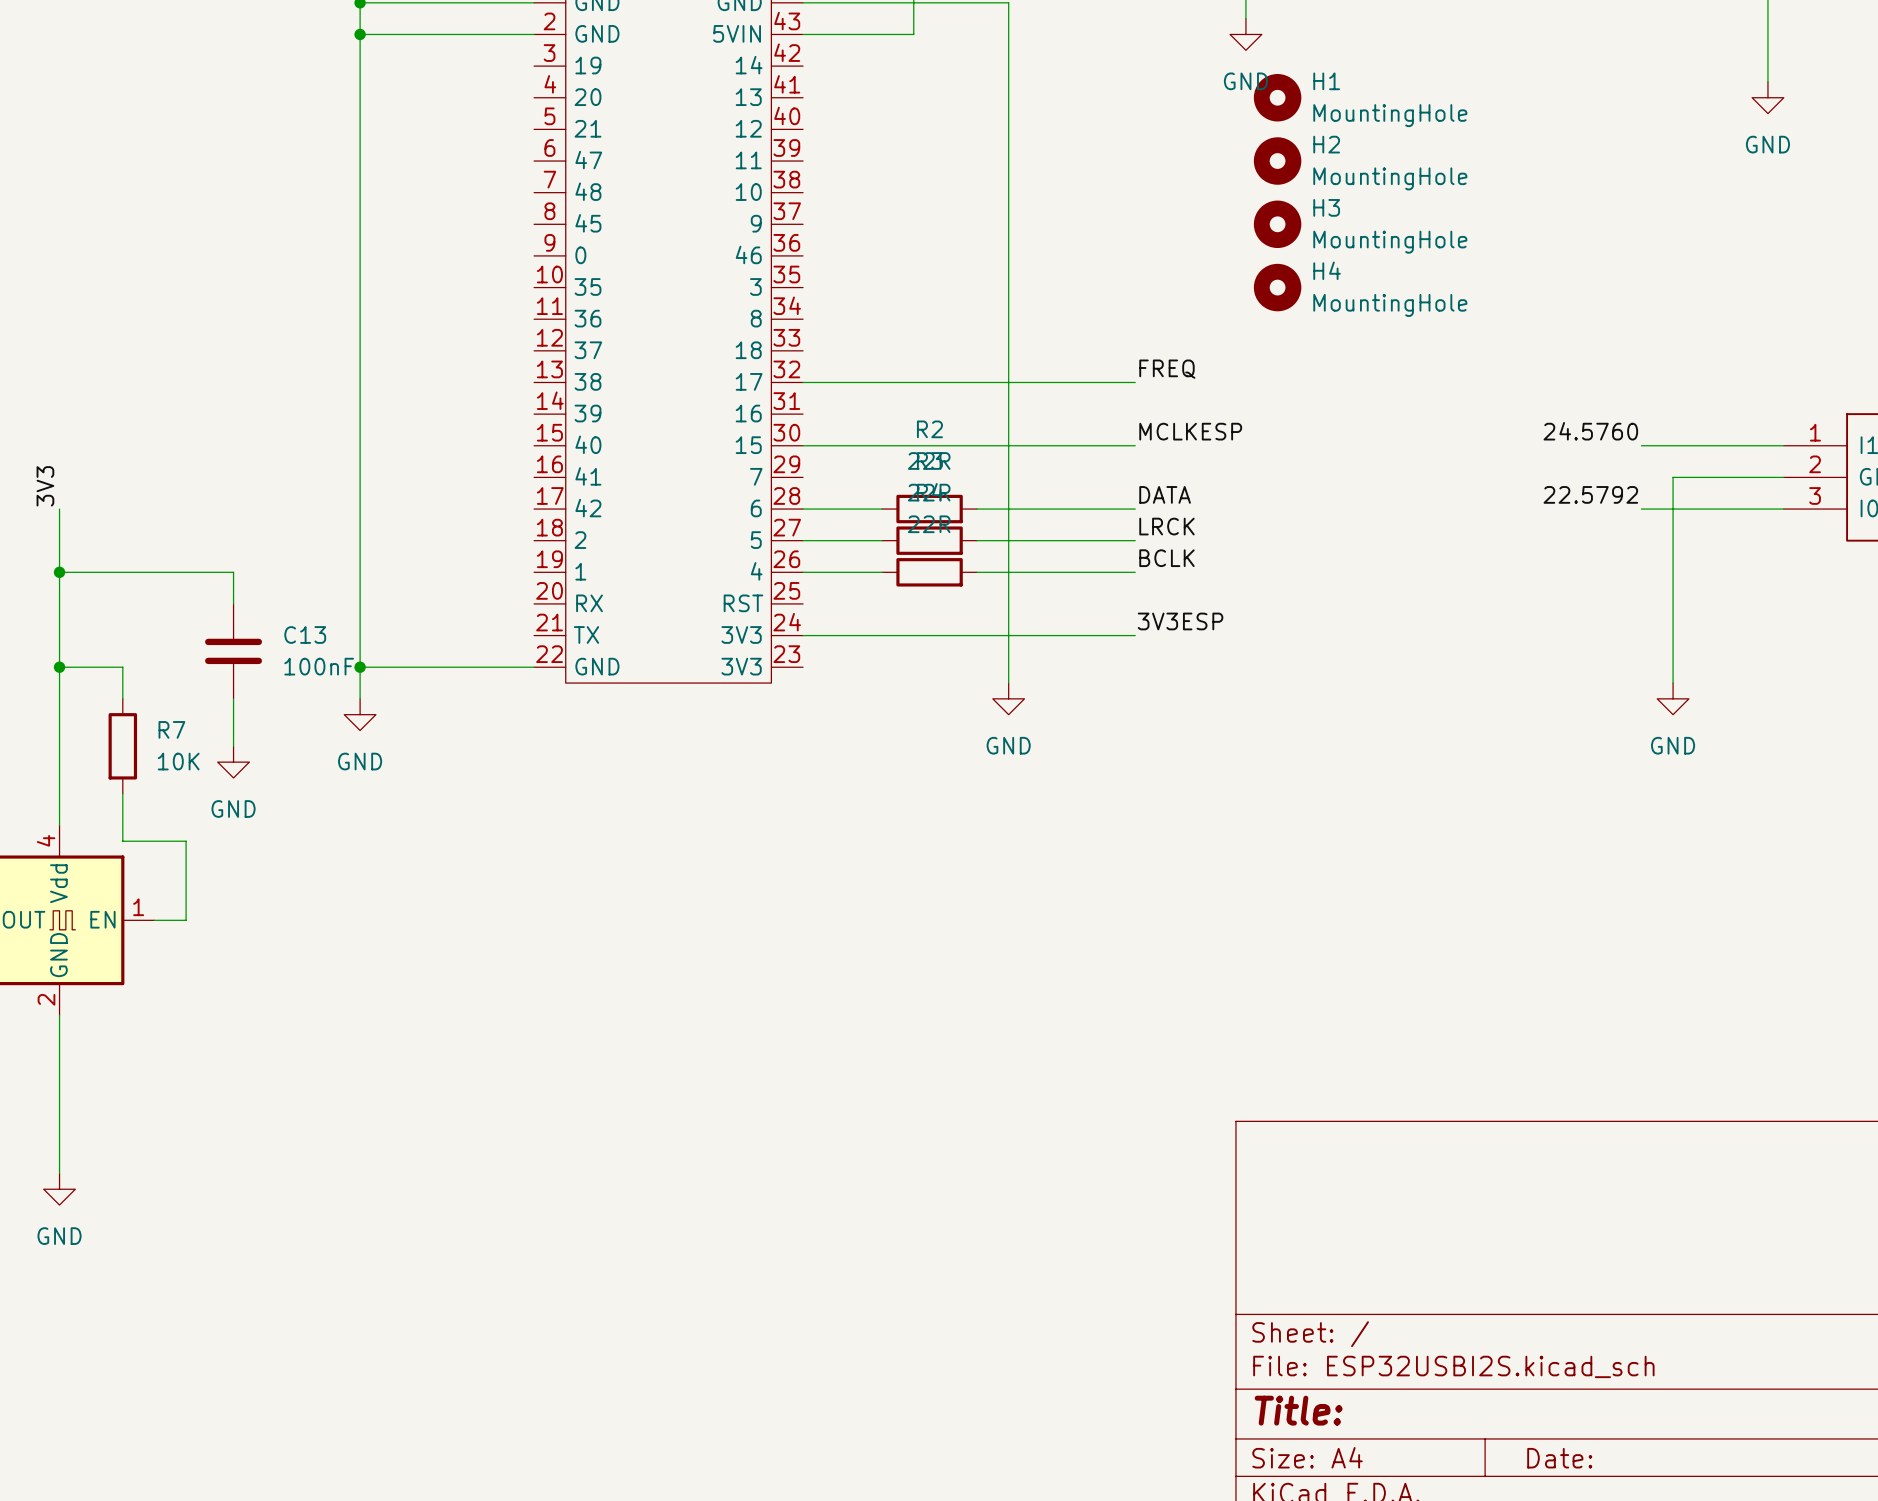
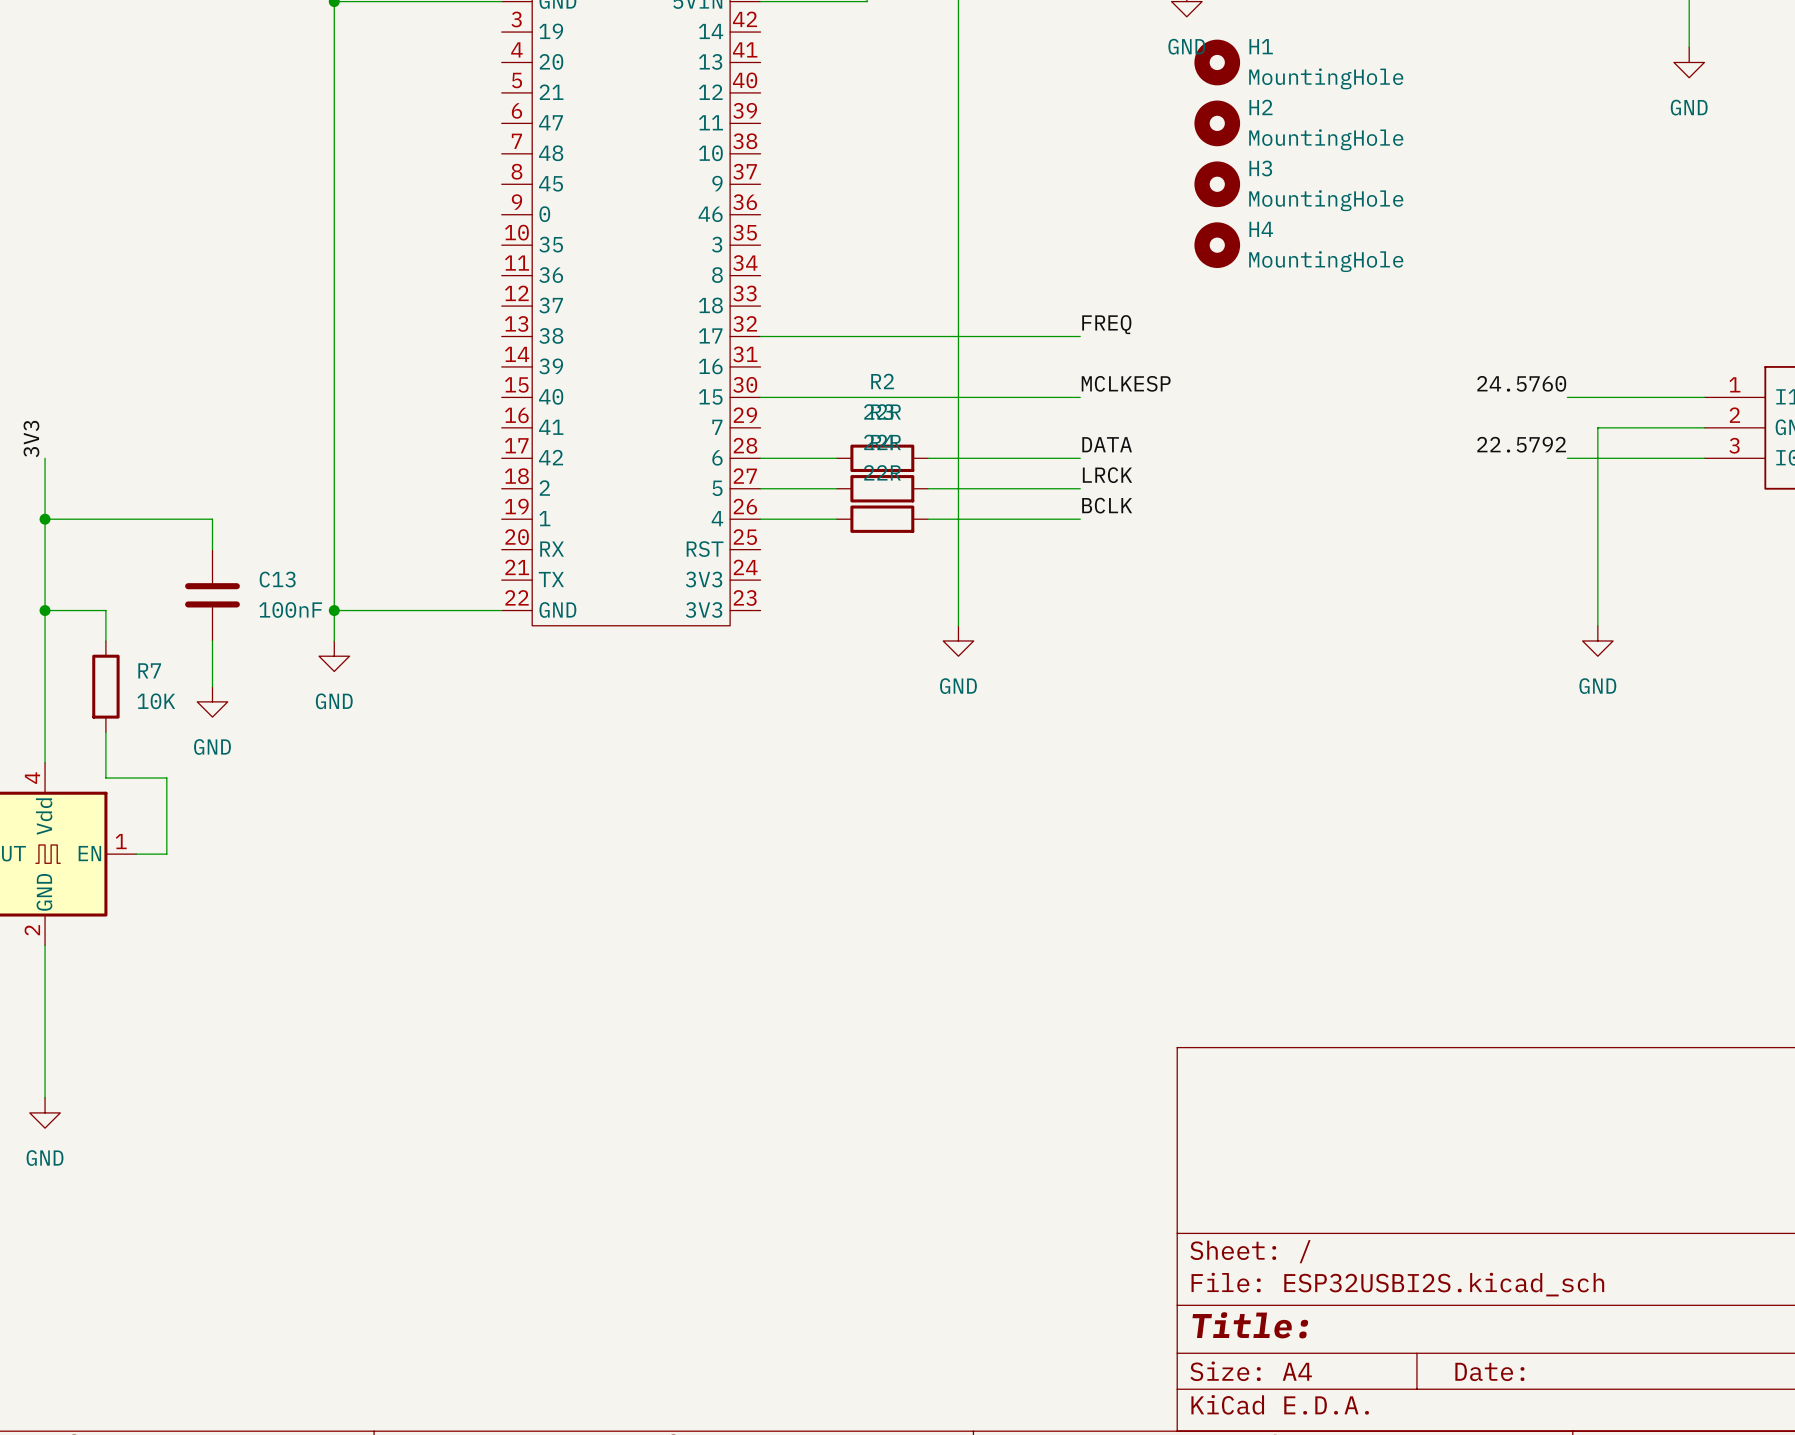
label: 3V3ESP (1180, 621) -> none
wire: (803, 635) (1135, 635) -> none

